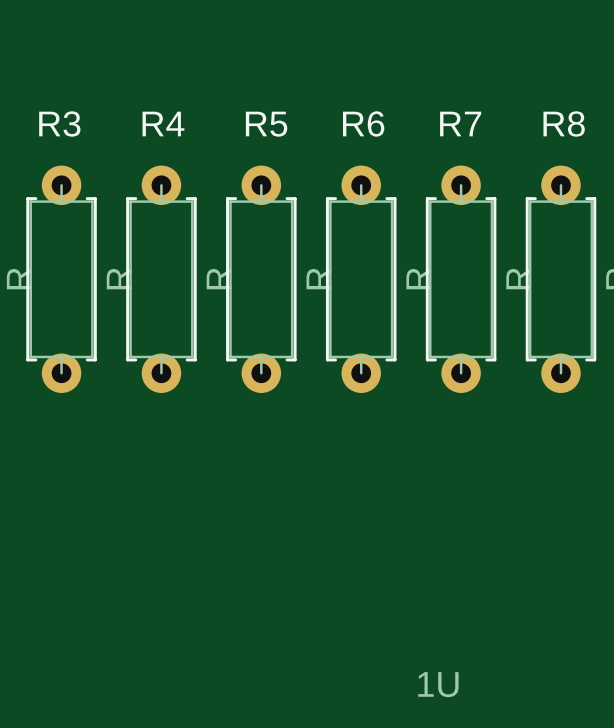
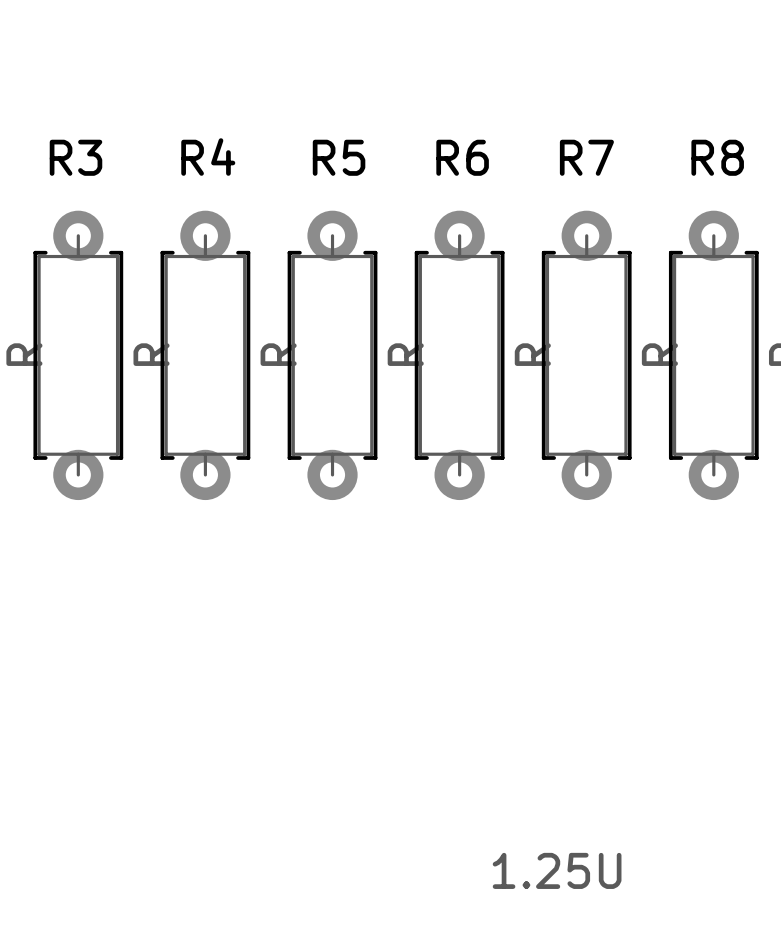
part text: 1U (438, 684) -> 1.25U (557, 870)

